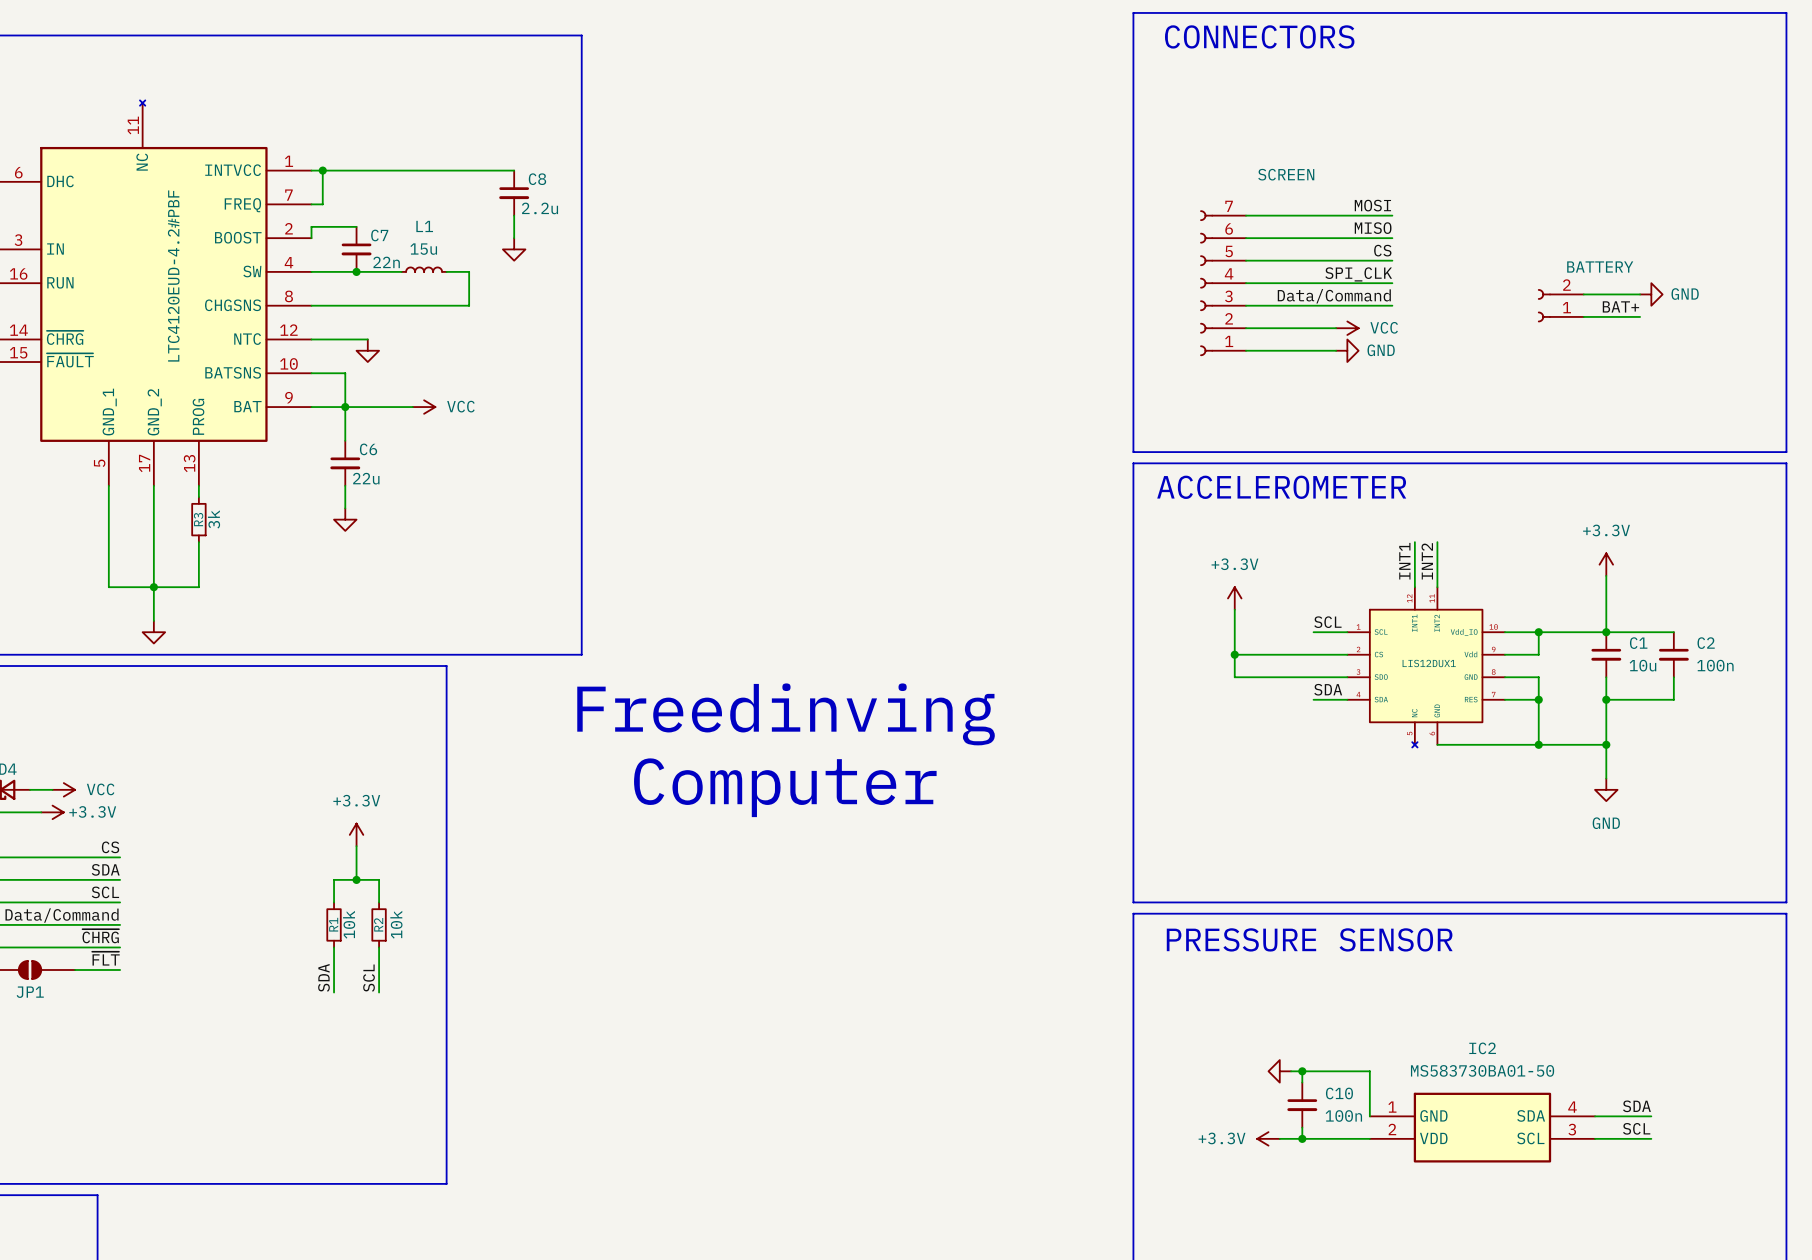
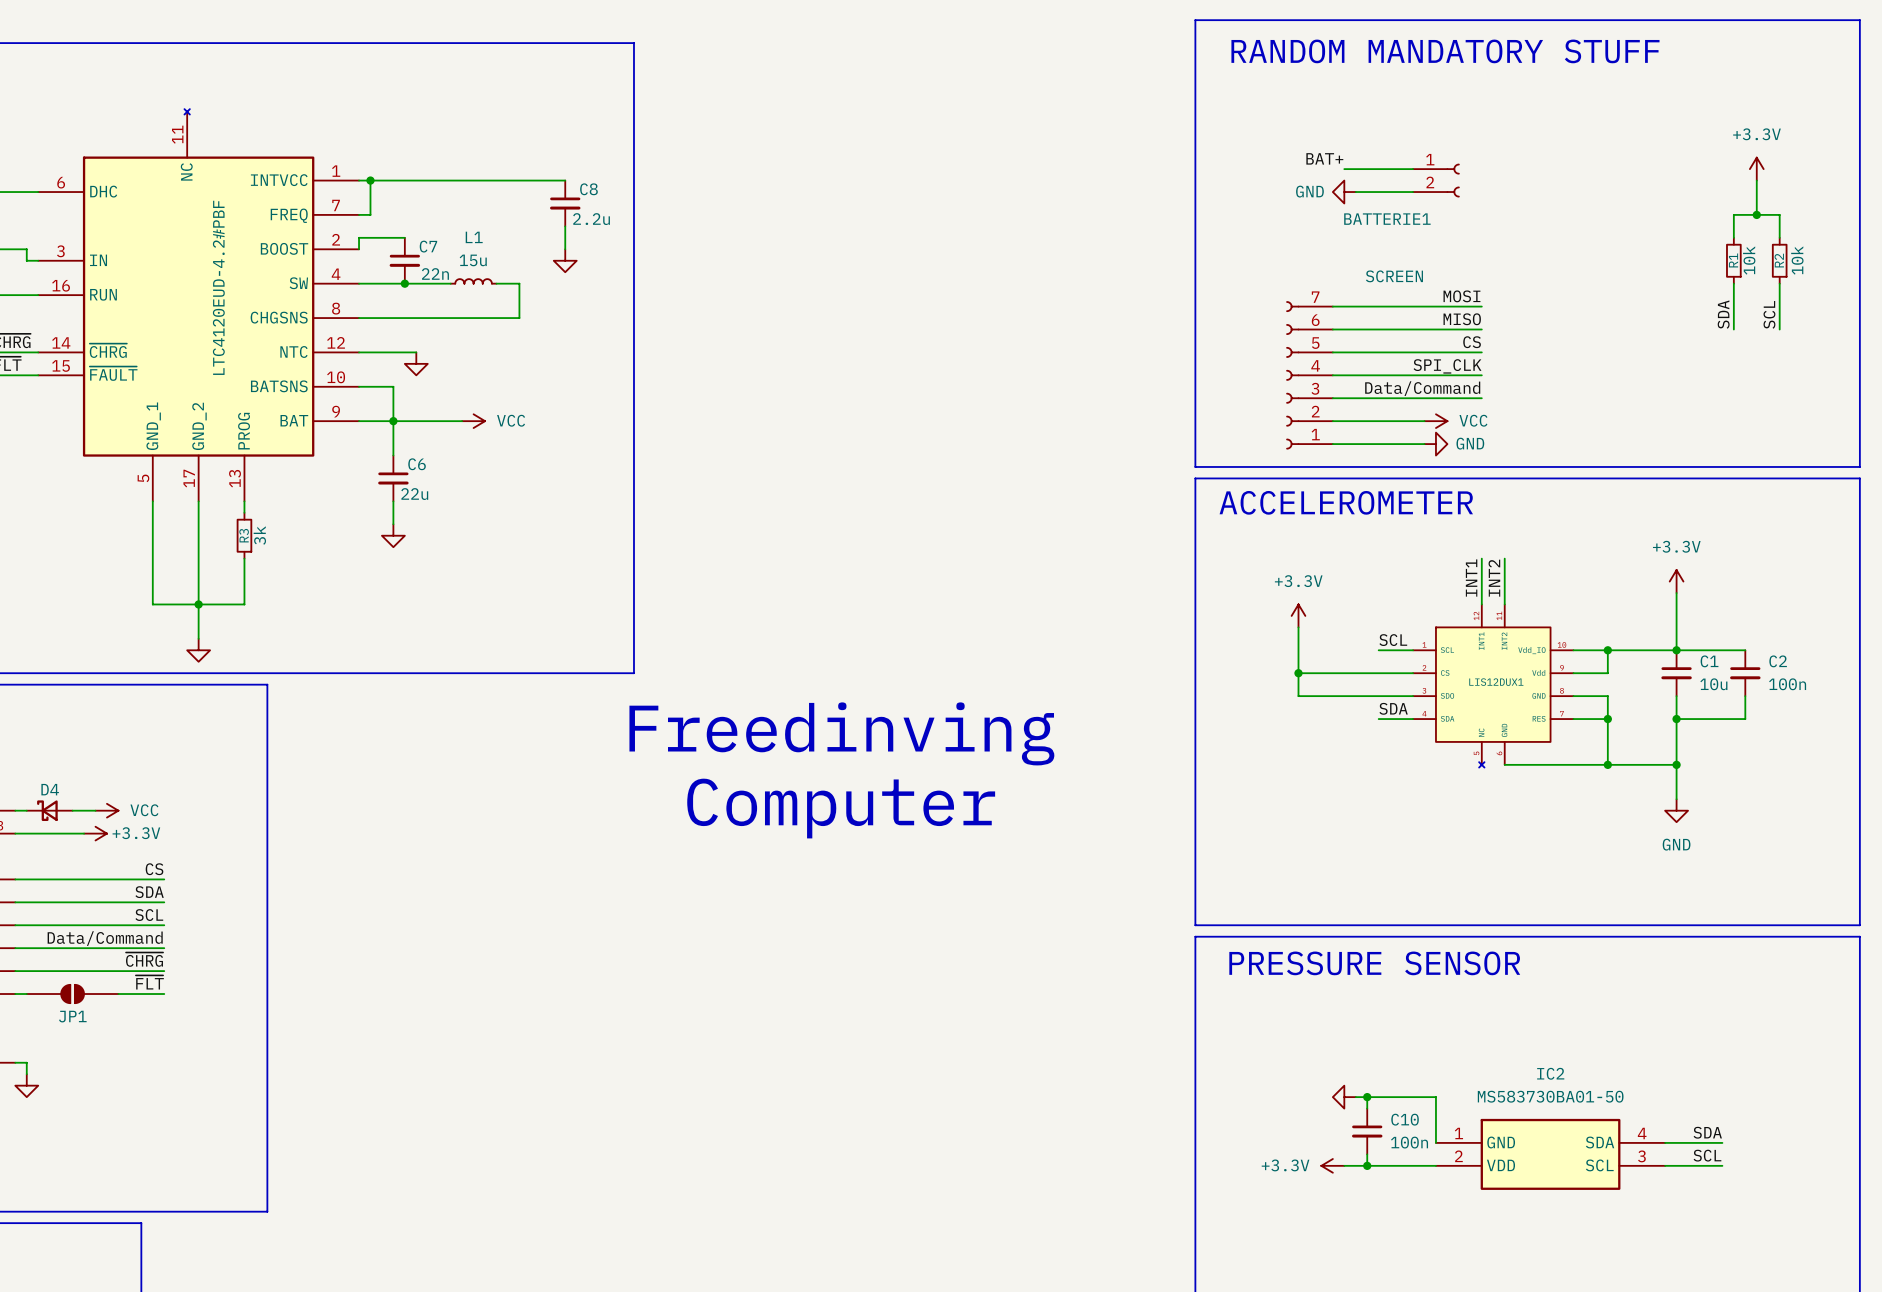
text: CONNECTORS (1259, 36) -> none
text: none -> RANDOM MANDATORY STUFF (1445, 51)
label: none -> BAT+ (1324, 158)
wire: none -> (1344, 169) (1413, 169)
power symbol: none -> +3.3V (1756, 169)
BATTERIE1: none -> (1436, 180)
wire: none -> (1756, 180) (1756, 214)
part value position: SCREEN (1286, 174) -> SCREEN (1394, 276)
power symbol: none -> GND (1344, 192)
wire: none -> (1355, 192) (1413, 192)
junction: none -> (1756, 214)
label position: MOSI (1372, 205) -> MOSI (1461, 296)
wire: (1246, 215) (1392, 215) -> (1332, 306) (1481, 306)
wire: none -> (1733, 237) (1733, 214) (1779, 214) (1779, 237)
label position: MISO (1373, 228) -> MISO (1462, 319)
wire: (1246, 238) (1392, 238) -> (1332, 329) (1481, 329)
label position: CS (1382, 250) -> CS (1472, 342)
wire: (1246, 260) (1392, 260) -> (1332, 352) (1481, 352)
wire: none -> (1733, 283) (1733, 329)
wire: none -> (1779, 283) (1779, 329)
label position: SPI_CLK (1358, 274) -> SPI_CLK (1447, 366)
part position: (1223, 283) -> (1309, 375)
wire: (1246, 283) (1392, 283) -> (1332, 375) (1481, 375)
wire: (1583, 294) (1640, 294) -> none
power symbol: GND (1651, 294) -> none
label position: Data/Command (1334, 296) -> Data/Command (1422, 388)
label: none -> SDA (1723, 314)
label: none -> SCL (1769, 314)
wire: (1246, 305) (1392, 305) -> (1332, 398) (1481, 398)
BATTERY: (1560, 305) -> none
label: BAT+ (1620, 306) -> none
wire: (1583, 316) (1640, 316) -> none
wire: (1246, 328) (1336, 328) -> (1332, 421) (1424, 421)
power symbol position: VCC (1347, 328) -> VCC (1435, 421)
wire: (1246, 350) (1336, 350) -> (1332, 444) (1424, 444)
power symbol position: GND (1347, 350) -> GND (1435, 444)
line: (221, 666) (446, 666) (446, 1183) (221, 1183) -> (267, 684) (267, 1211)
power symbol: +3.3V (356, 834) -> none
wire: (356, 846) (356, 879) -> none
junction: (356, 879) -> none
wire: (334, 902) (334, 879) (379, 879) (379, 902) -> none
R1 position: (334, 924) -> (1733, 260)
R2 position: (379, 924) -> (1779, 260)
wire: (334, 947) (334, 992) -> none
wire: (379, 947) (379, 992) -> none
label: SDA (323, 977) -> none
label: SCL (369, 978) -> none

